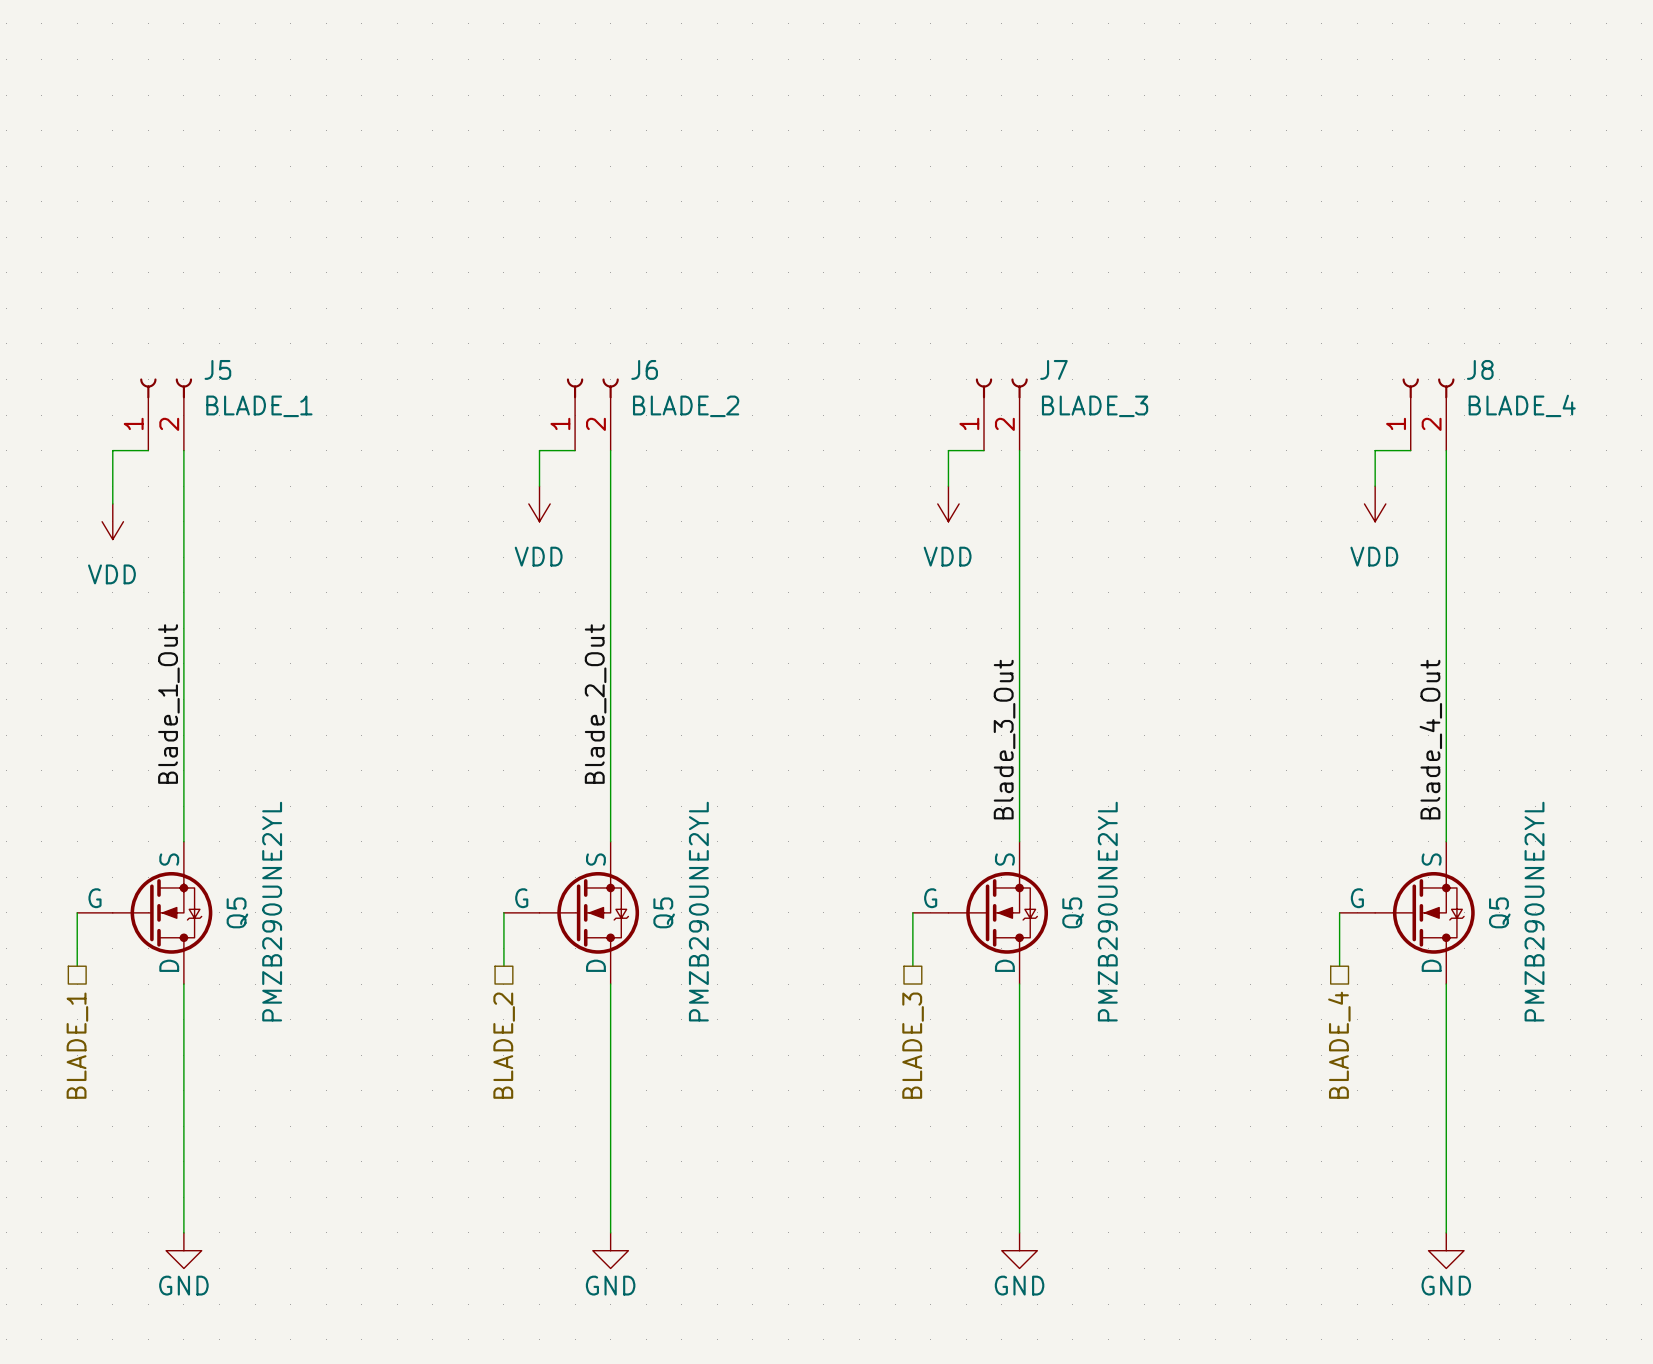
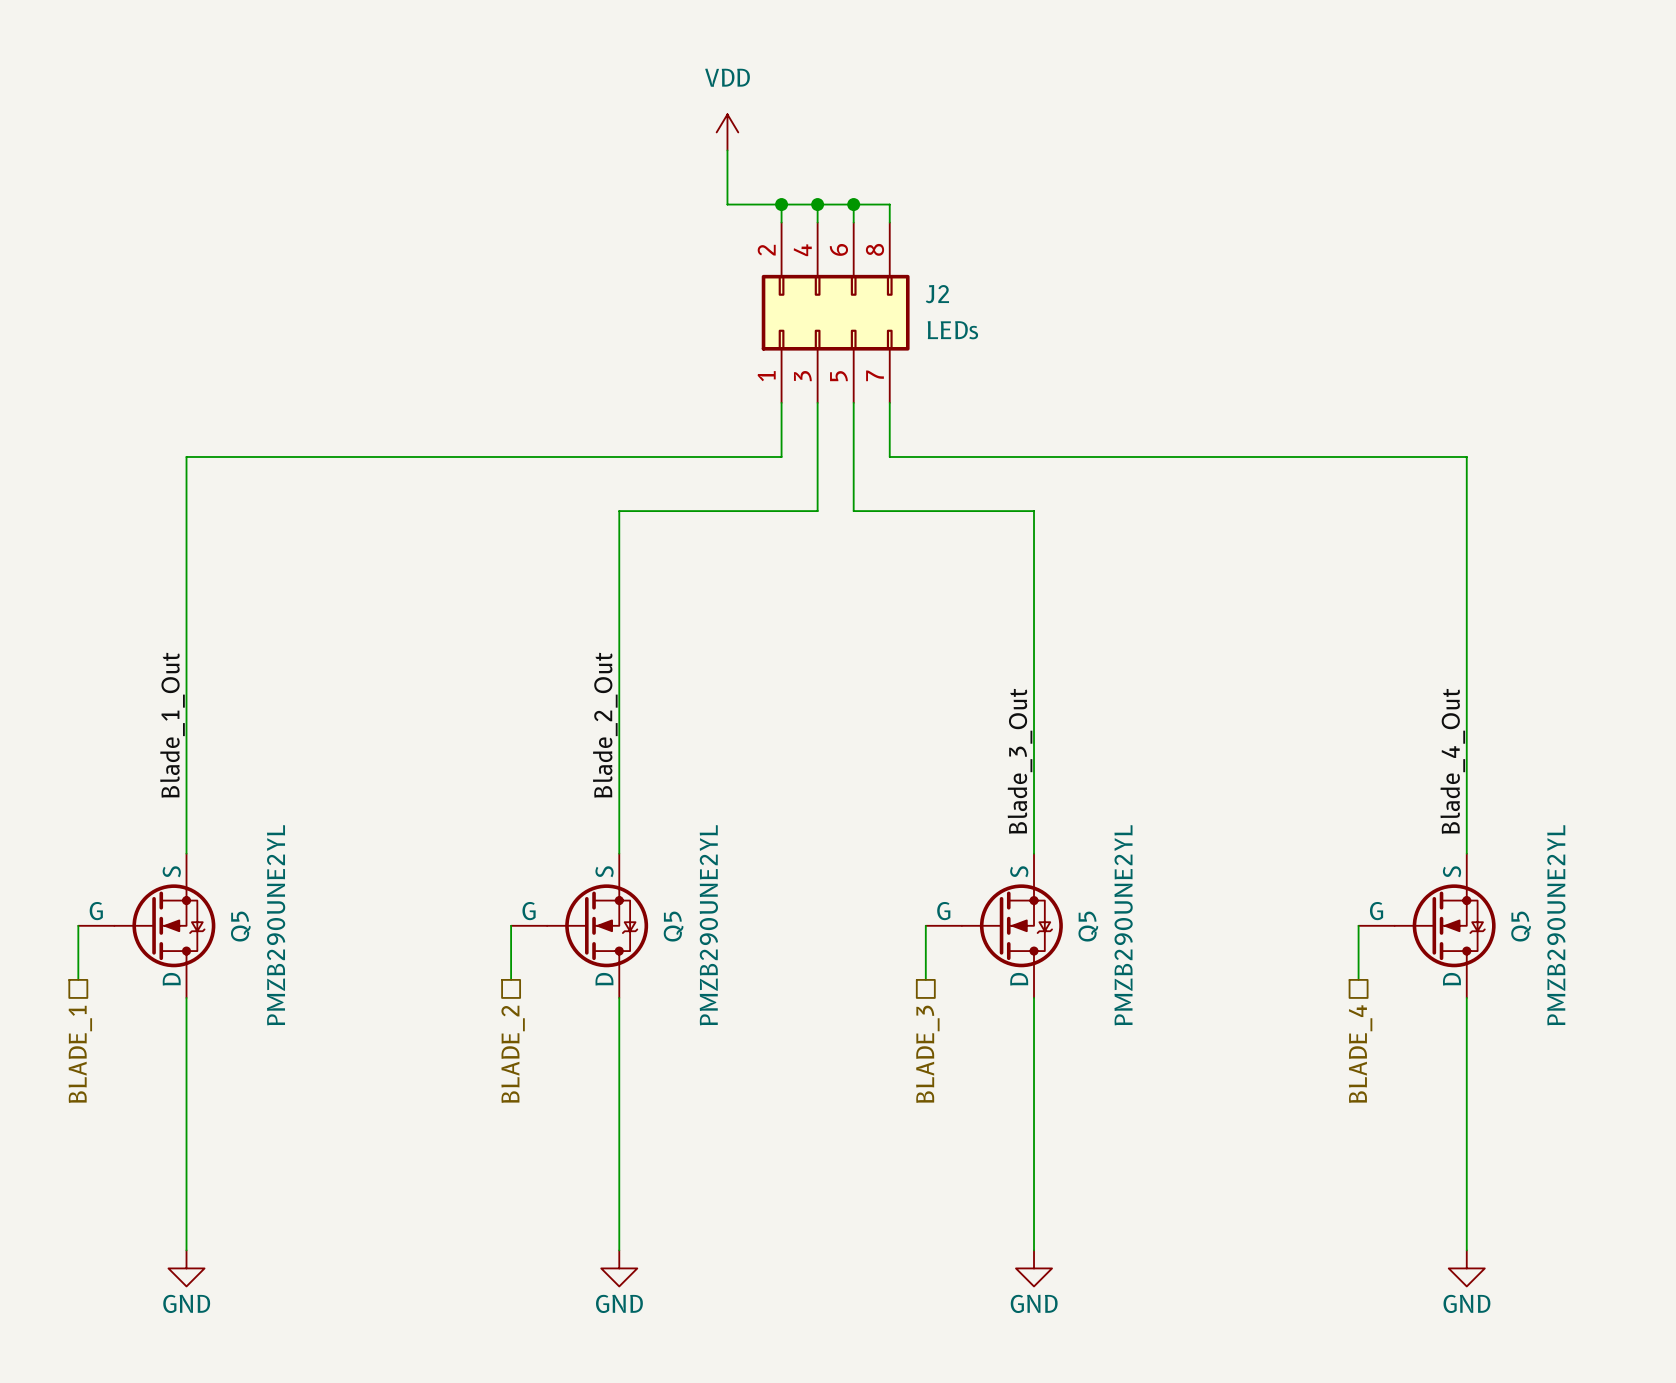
power symbol: none -> VDD (727, 132)
wire: none -> (727, 150) (727, 204) (889, 204) (889, 222)
wire: none -> (781, 204) (781, 222)
junction: none -> (781, 204)
wire: none -> (817, 204) (817, 222)
junction: none -> (817, 204)
wire: none -> (853, 204) (853, 222)
junction: none -> (853, 204)
J2: none -> LEDs (835, 312)
wire: none -> (781, 402) (781, 456) (583, 456)
J5: BLADE_1 (166, 414) -> none
J6: BLADE_2 (592, 414) -> none
J7: BLADE_3 (1001, 414) -> none
J8: BLADE_4 (1428, 414) -> none
wire: (148, 450) (112, 450) (112, 503) -> none
wire: (539, 450) (539, 486) -> (547, 456) (186, 456)
wire: (610, 450) (610, 503) -> (817, 402) (817, 511) (619, 511)
wire: (948, 450) (948, 486) -> (961, 456) (889, 456) (889, 402)
wire: (1019, 450) (1019, 503) -> (853, 402) (853, 511) (1034, 511)
wire: (1375, 450) (1375, 486) -> (1394, 456) (997, 456)
wire: none -> (1430, 456) (1466, 456)
power symbol: VDD (539, 503) -> none
power symbol: VDD (948, 503) -> none
power symbol: VDD (1375, 503) -> none
power symbol: VDD (112, 521) -> none

